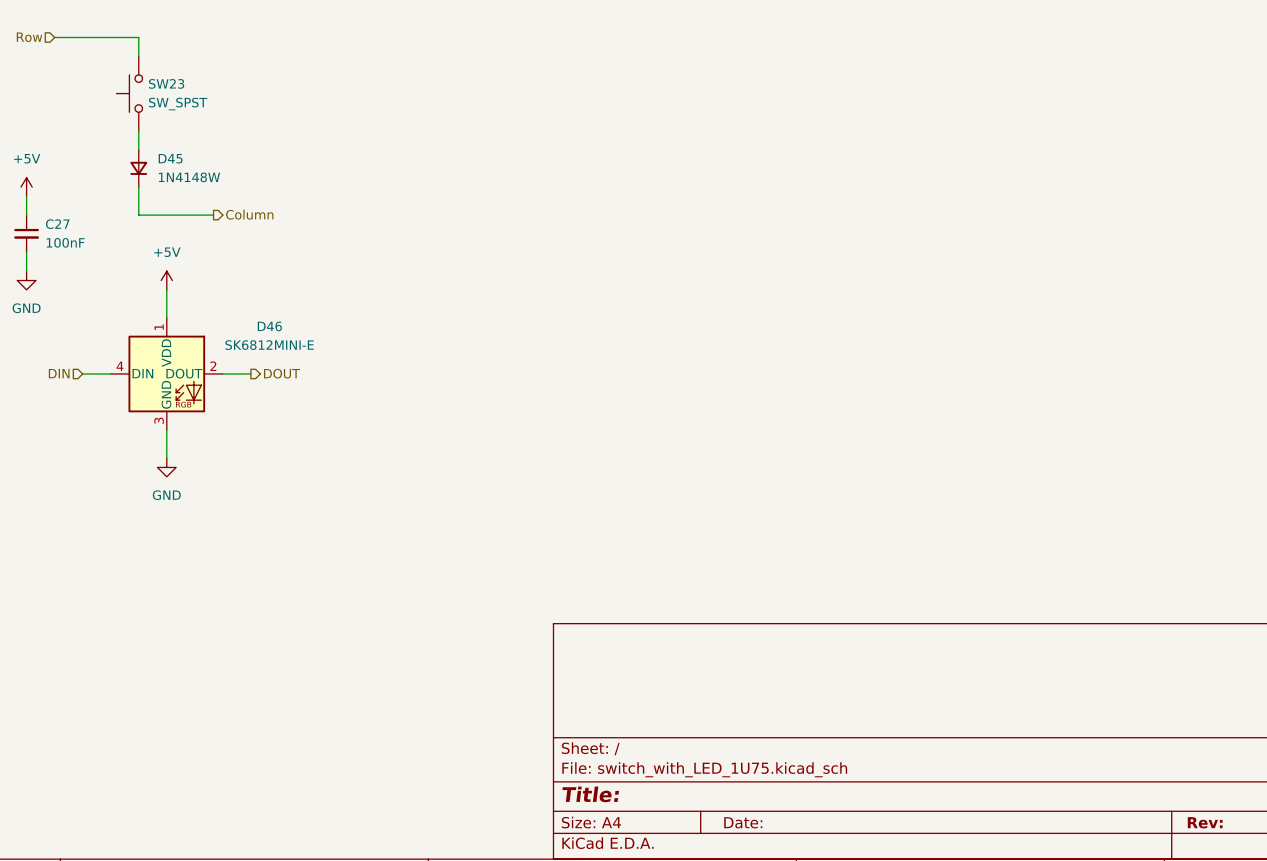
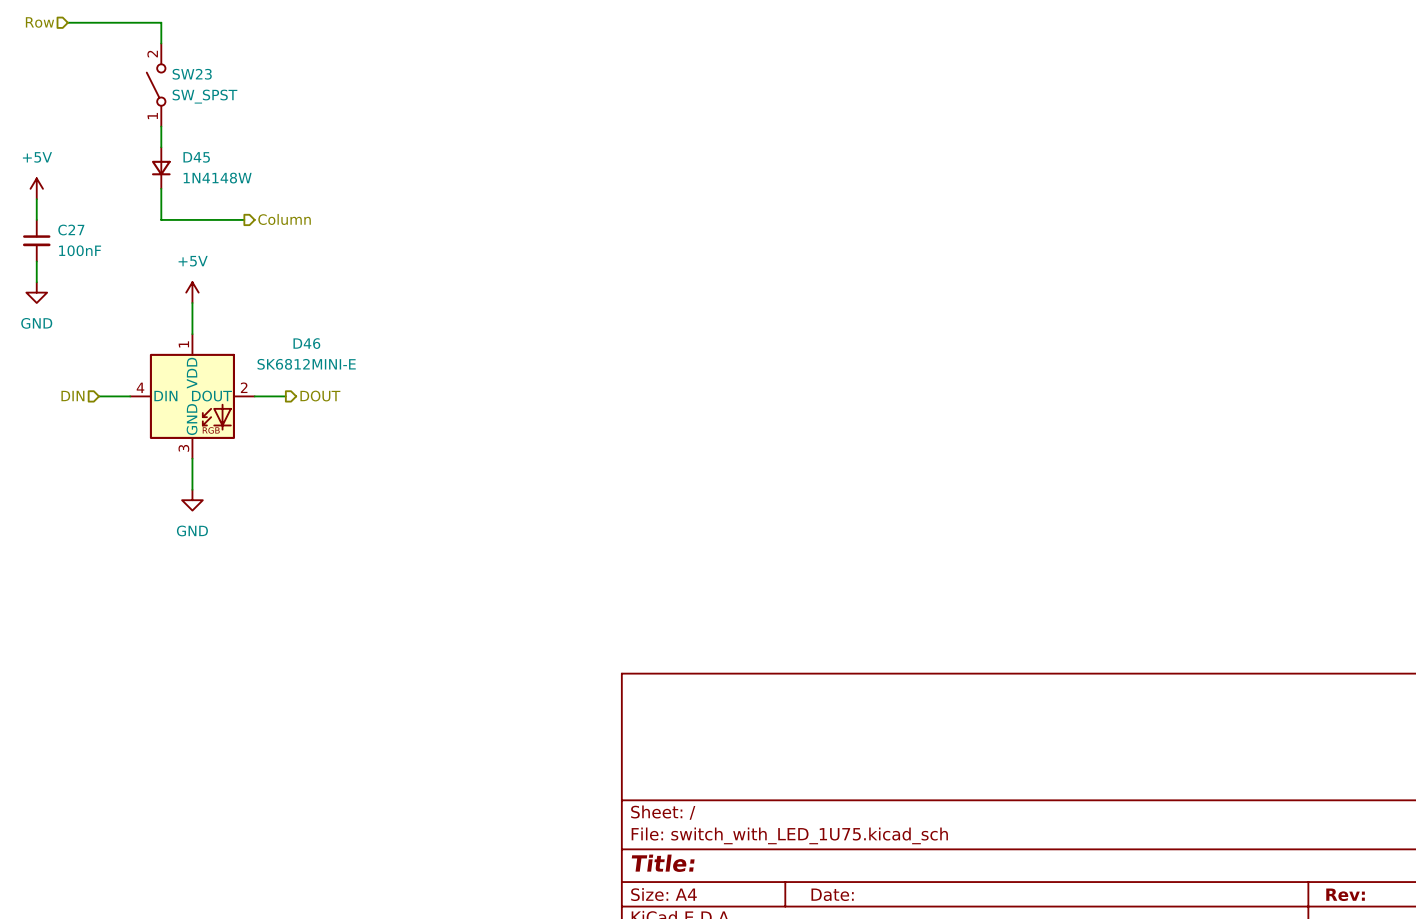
SW23 symbol: [116, 56, 143, 131] -> [146, 43, 166, 127]

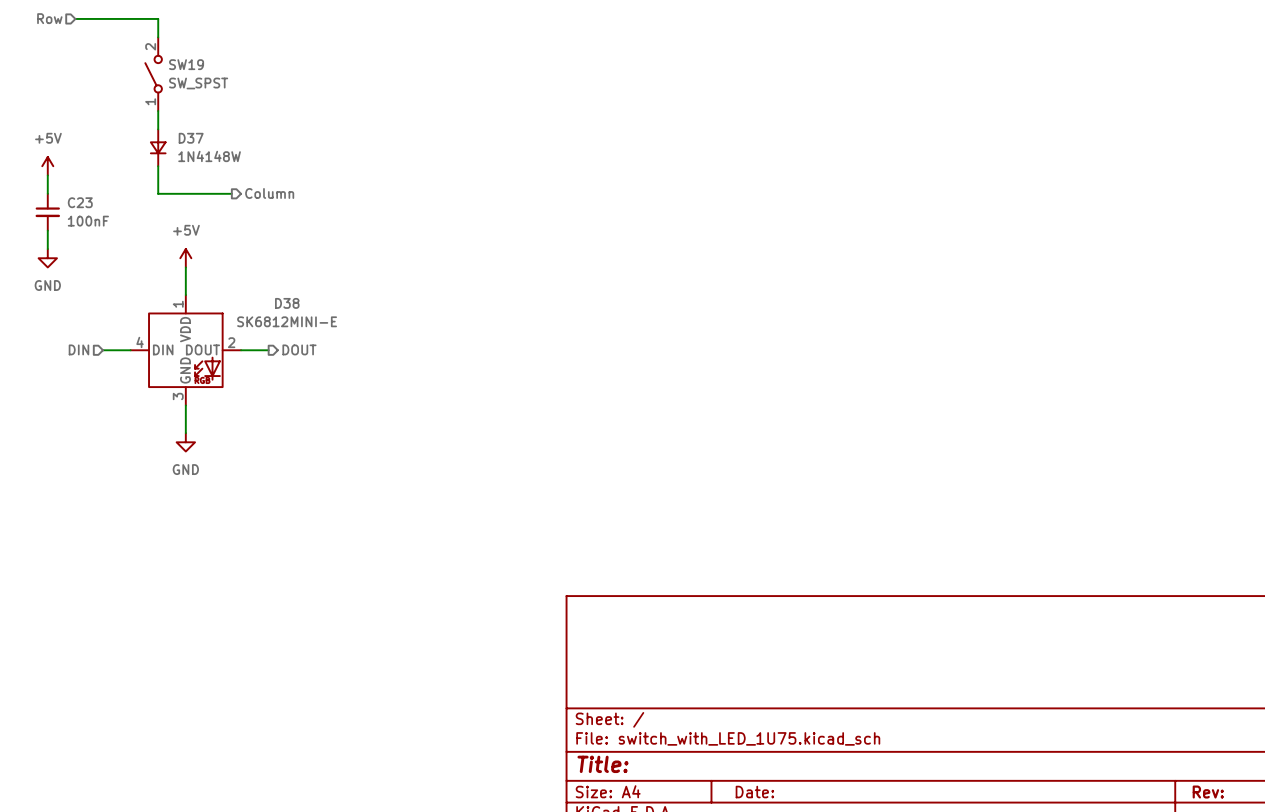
SW23 name: SW23 (192, 74) -> SW19 (186, 64)
D45 name: D45 (196, 157) -> D37 (191, 138)
C27 name: C27 (71, 230) -> C23 (80, 202)
D46 name: D46 (306, 343) -> D38 (287, 303)

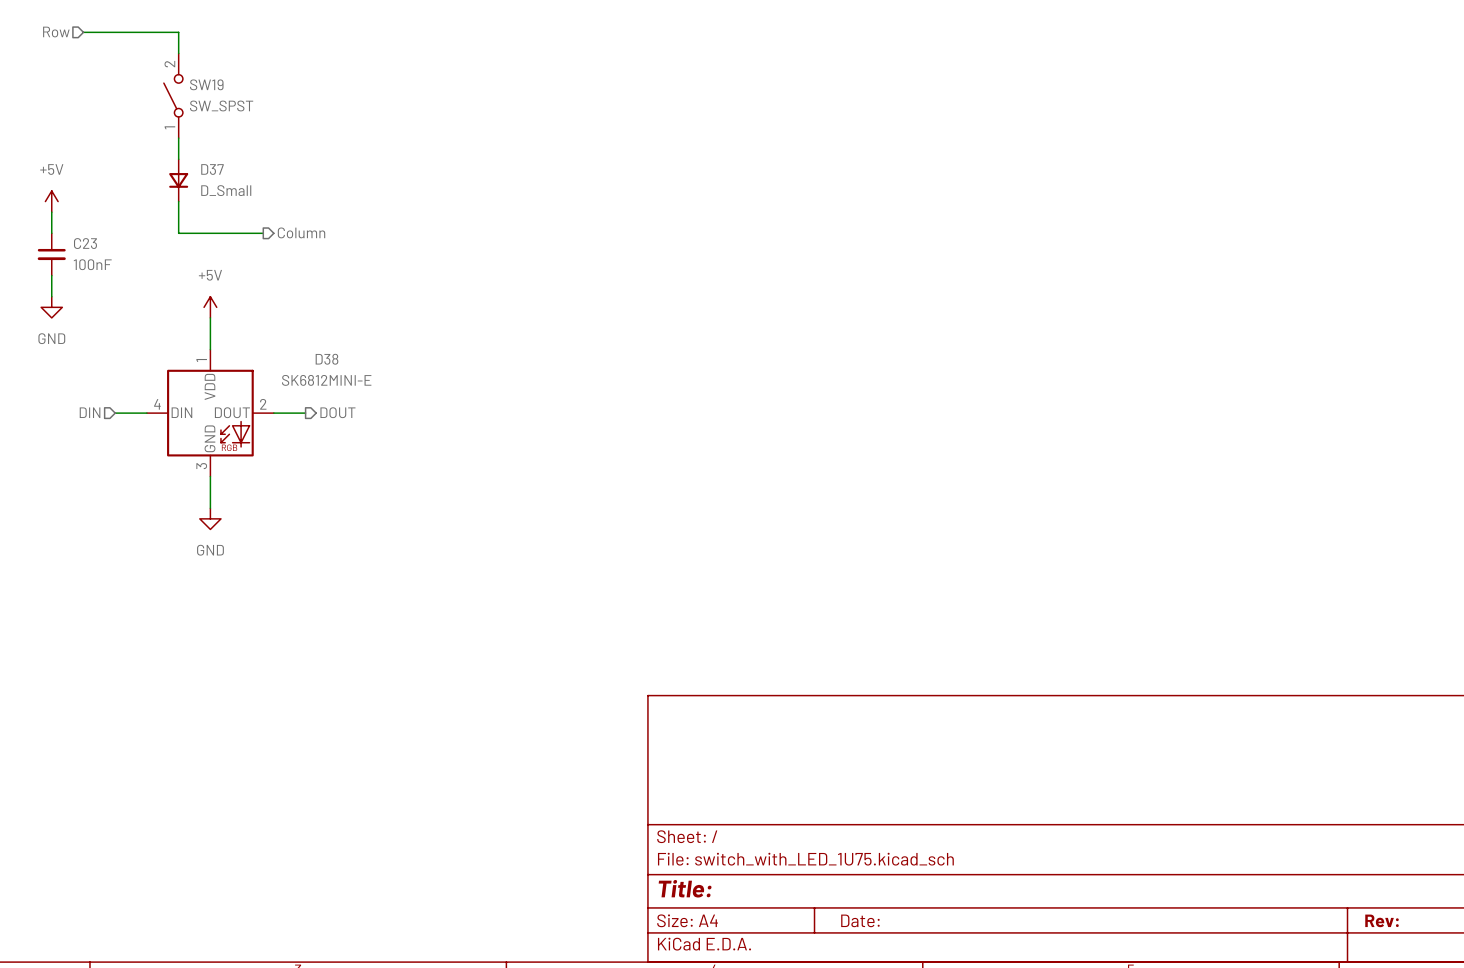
D37 value: 1N4148W (209, 156) -> D_Small (226, 190)

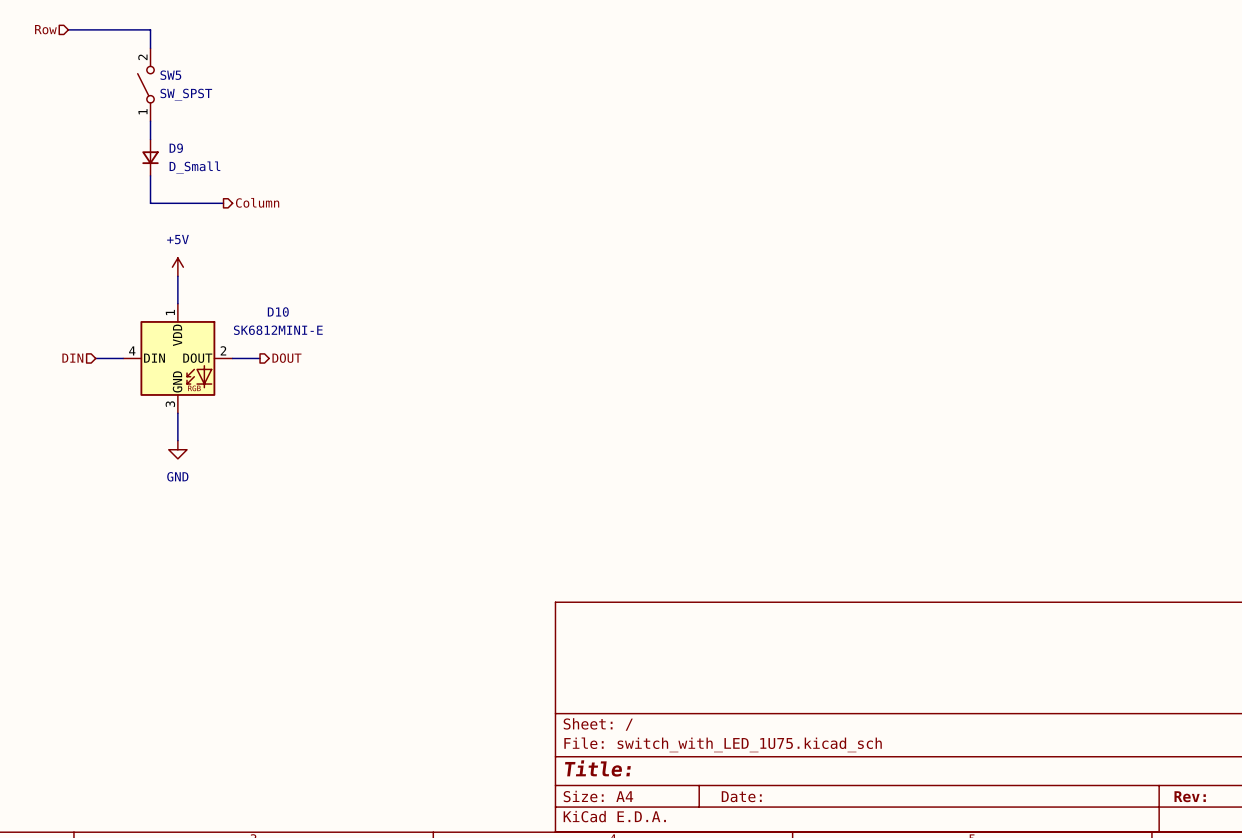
SW19 name: SW19 (206, 84) -> SW5 (170, 75)
D37 name: D37 (212, 169) -> D9 (176, 148)
power symbol: +5V (51, 201) -> none
wire: (51, 212) (51, 233) -> none
C23: 100nF (51, 254) -> none
wire: (51, 275) (51, 296) -> none
power symbol: GND (51, 307) -> none
D38 name: D38 (326, 359) -> D10 (278, 311)

